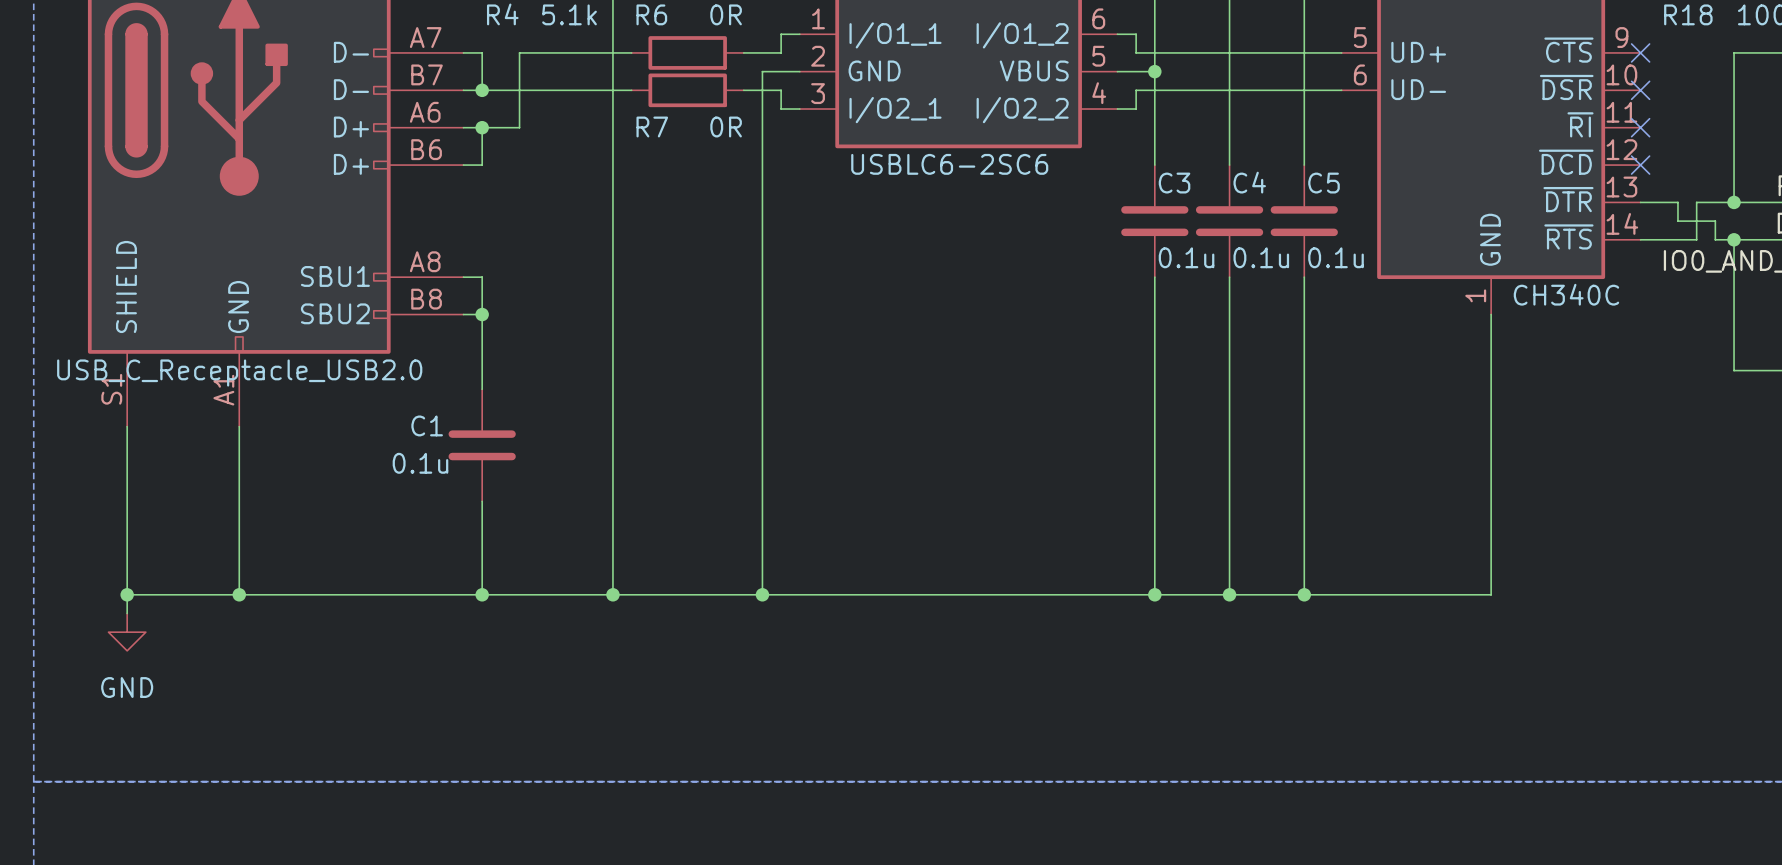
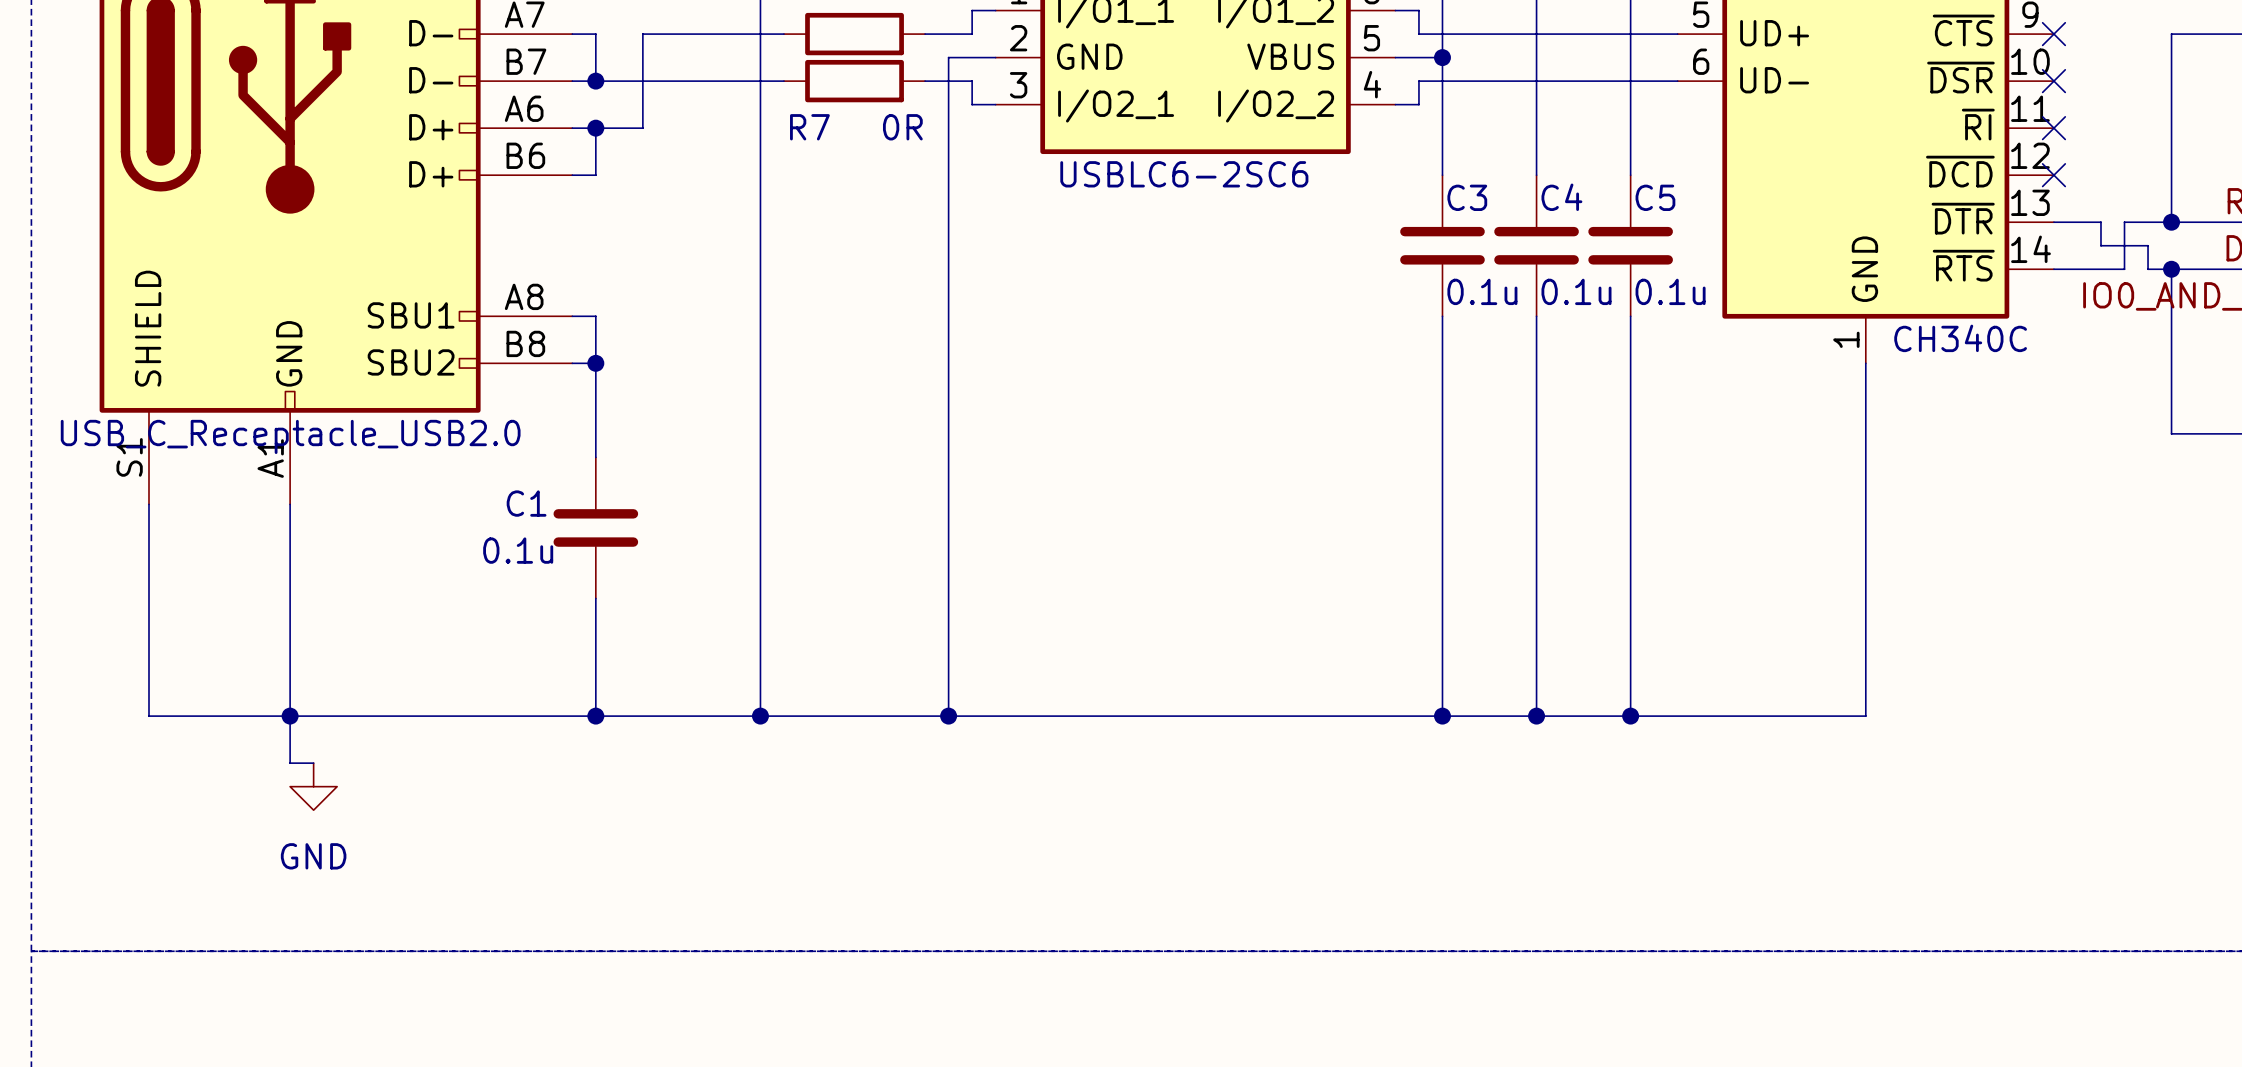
wire: (127, 594) (127, 613) -> none
junction: (127, 594) -> none
wire: none -> (290, 716) (290, 763) (313, 763)
power symbol position: GND (127, 632) -> GND (313, 786)

